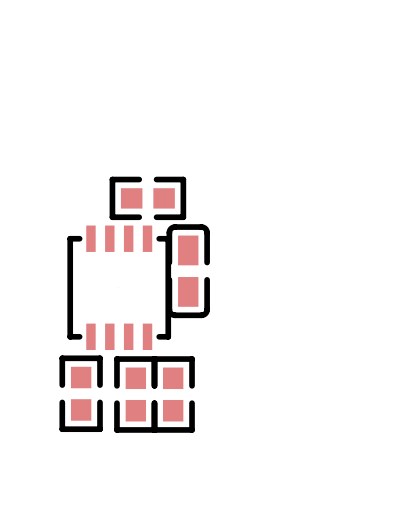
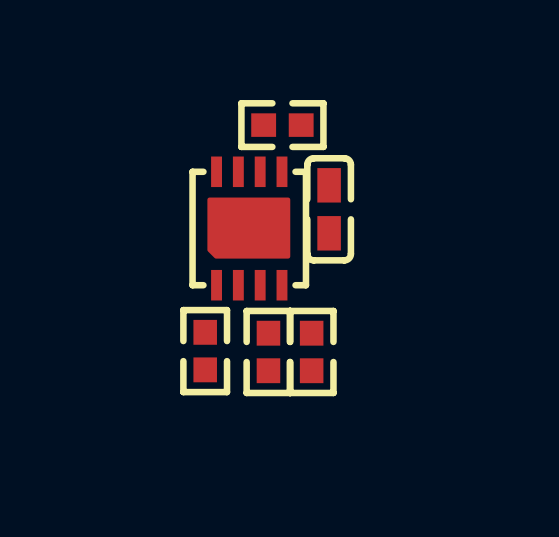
part footprint: [66, 225, 172, 354] -> [187, 156, 310, 304]

